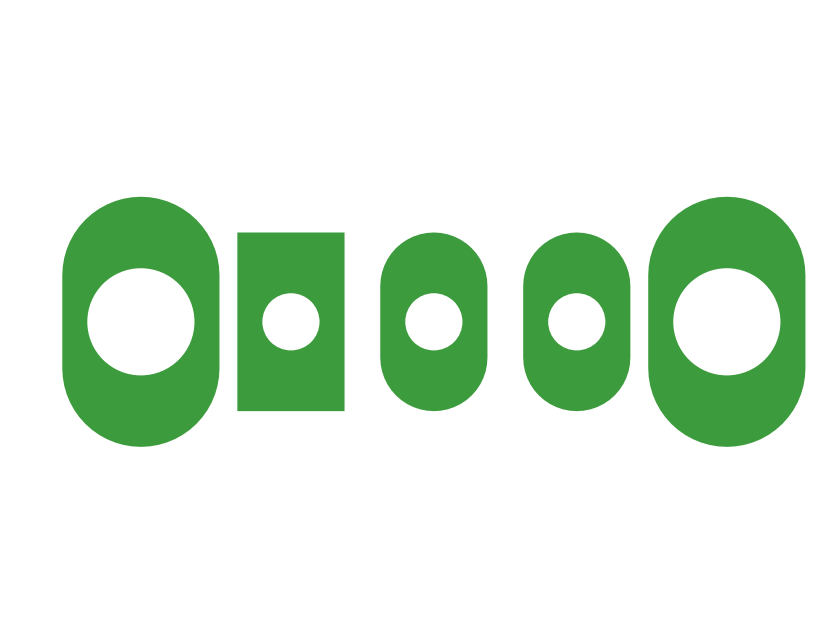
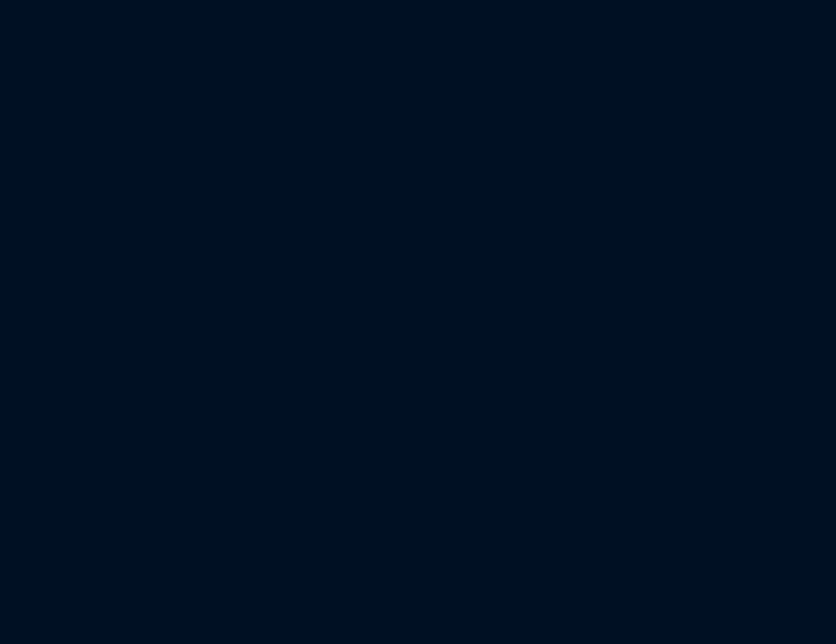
part: (433, 321) -> none

